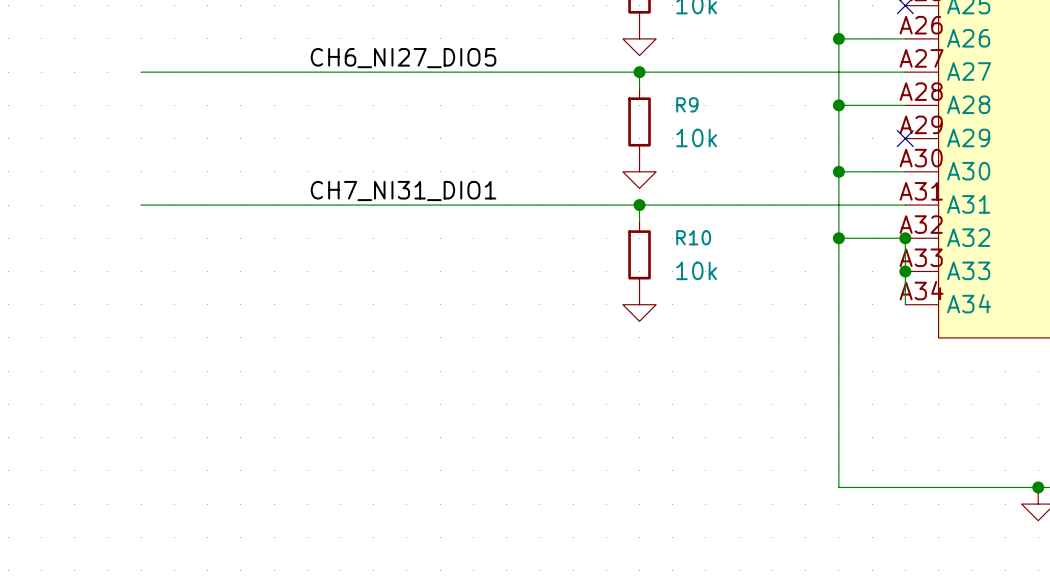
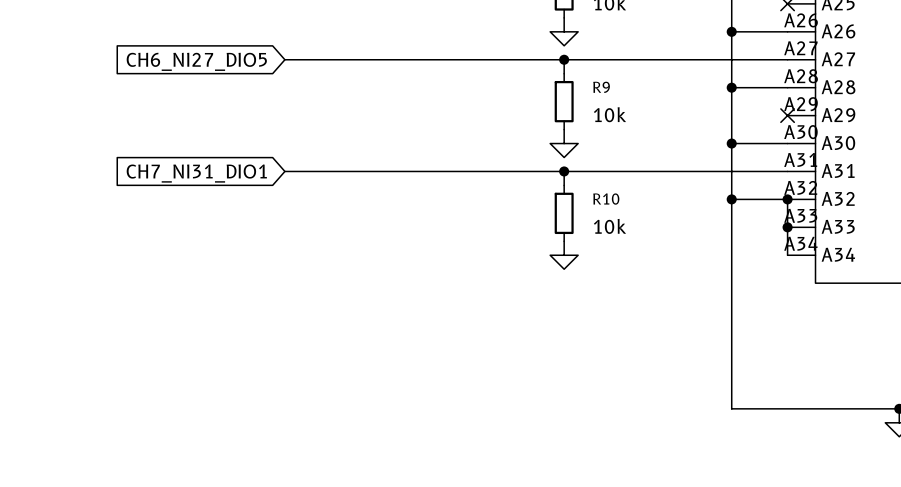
label: CH6_NI27_DIO5 (403, 58) -> none
wire: (141, 72) (307, 72) -> none
global label: none -> CH6_NI27_DIO5 (196, 61)
label: CH7_NI31_DIO1 (403, 191) -> none
wire: (141, 205) (307, 205) -> none
global label: none -> CH7_NI31_DIO1 (196, 173)

